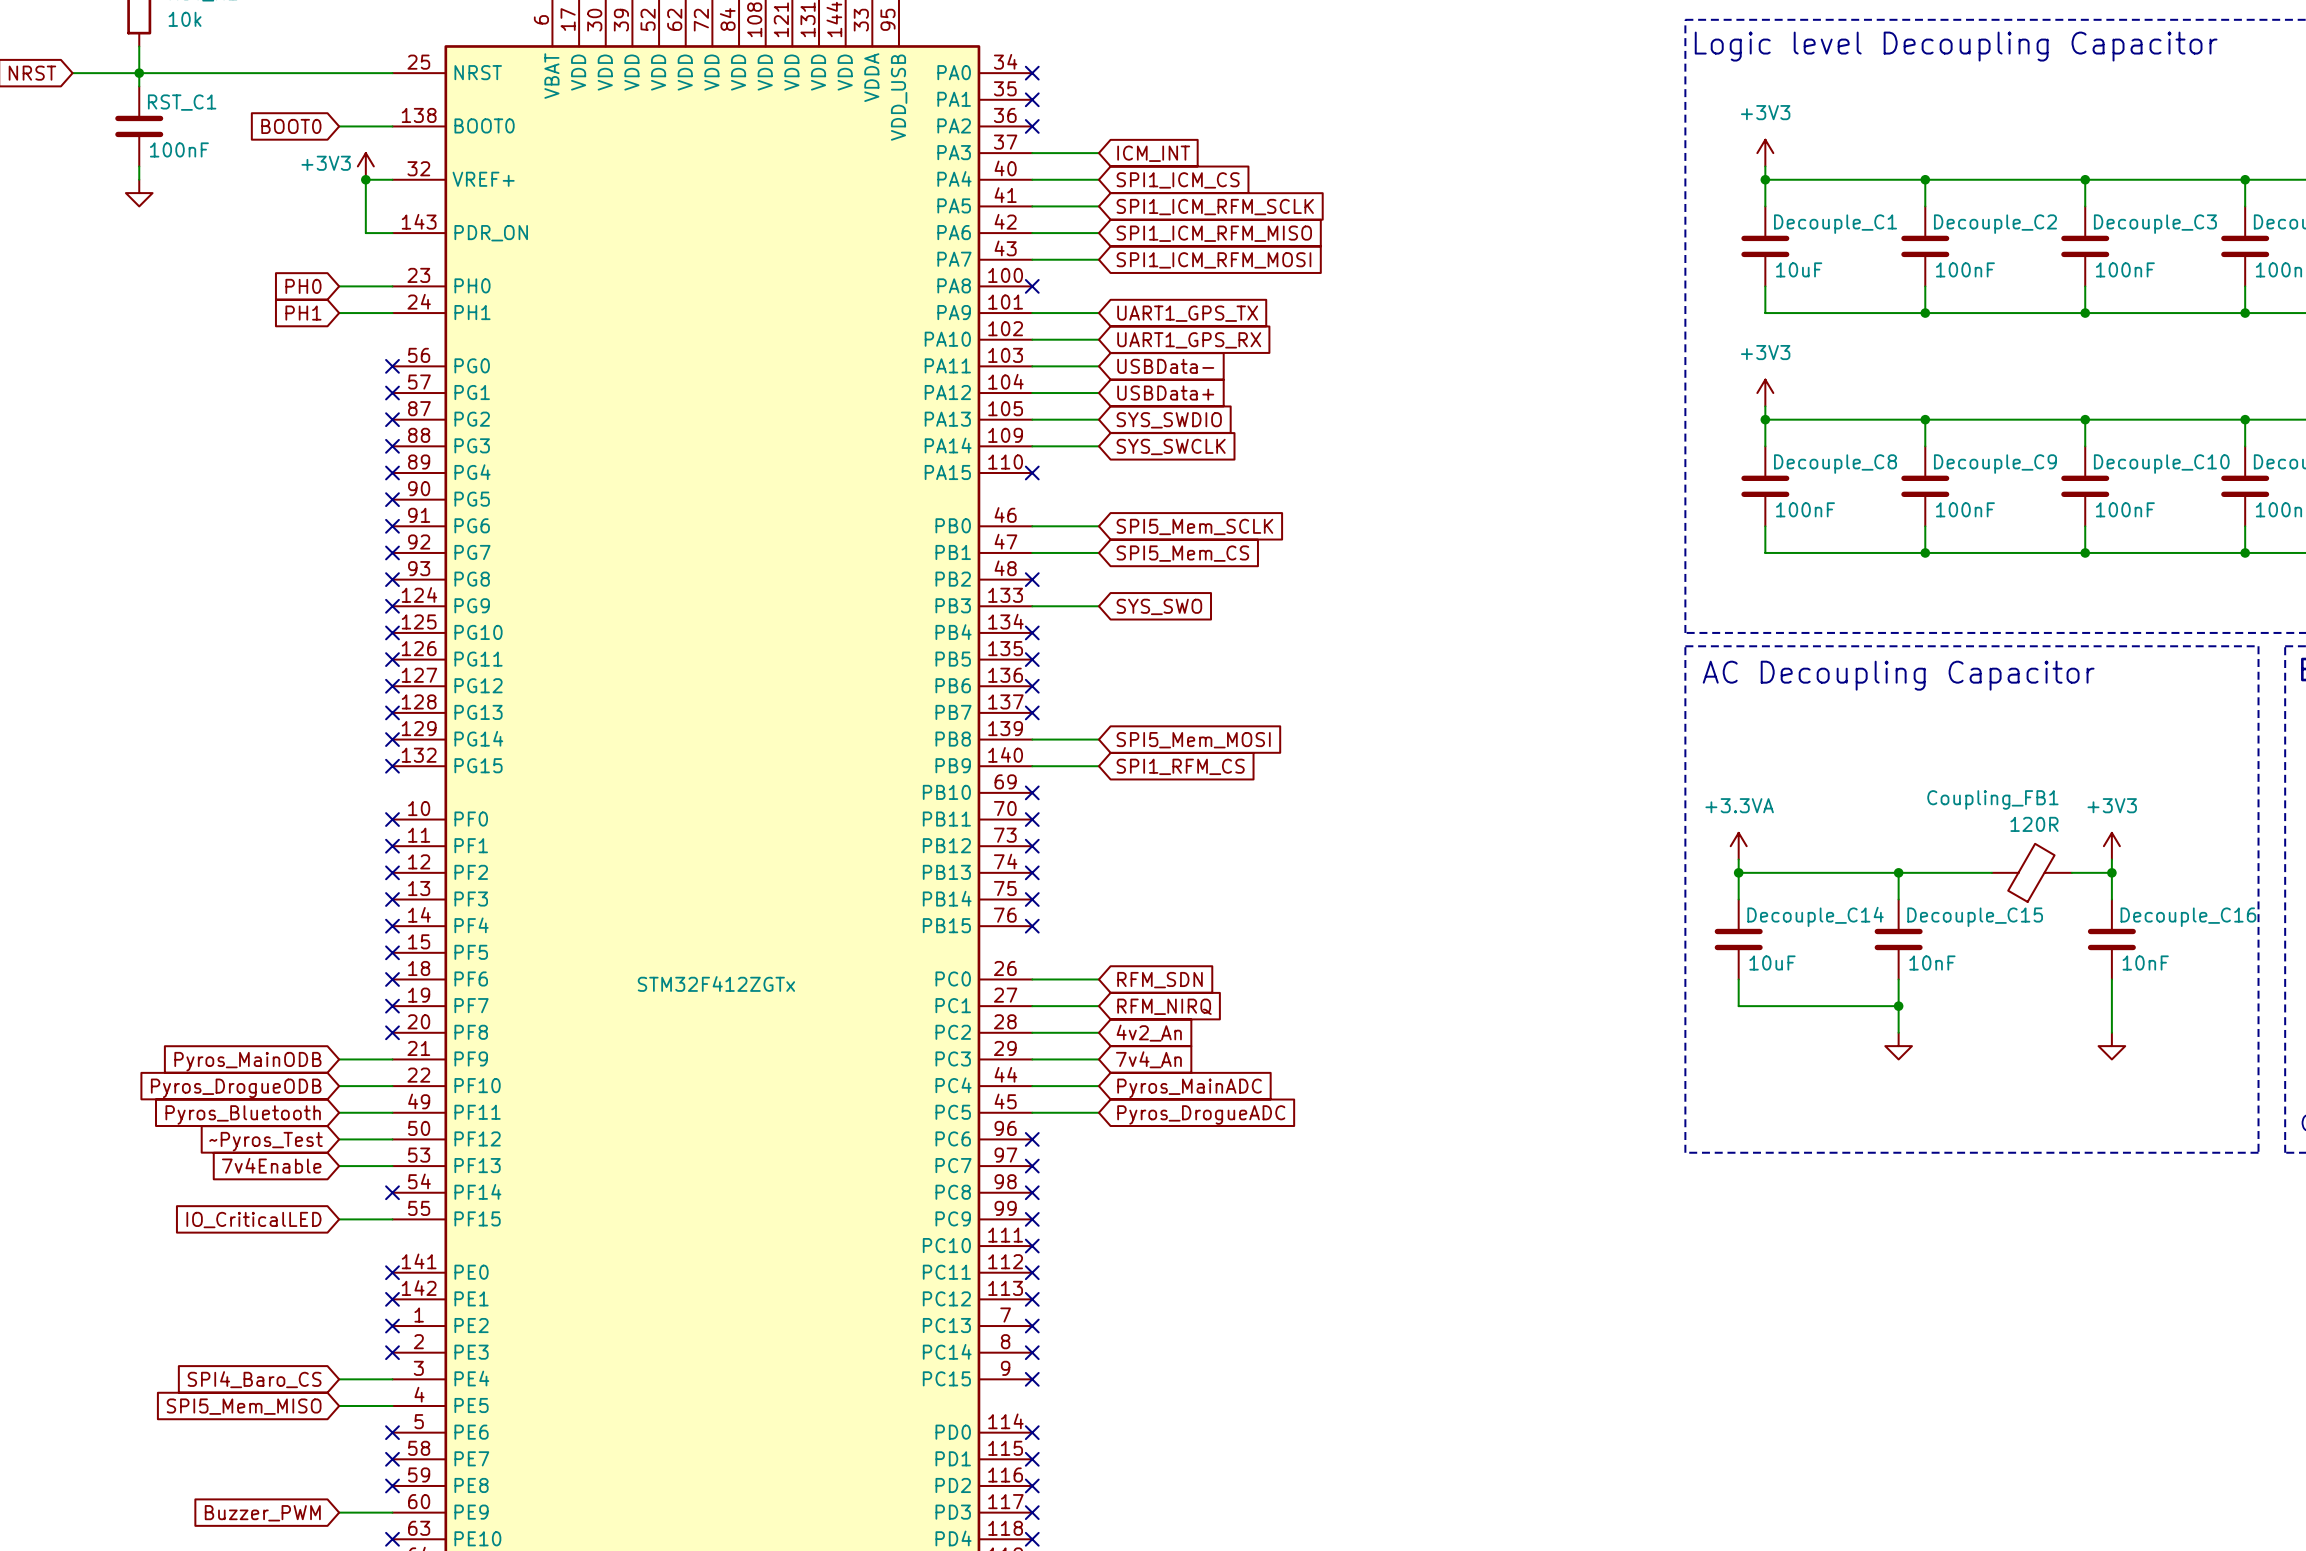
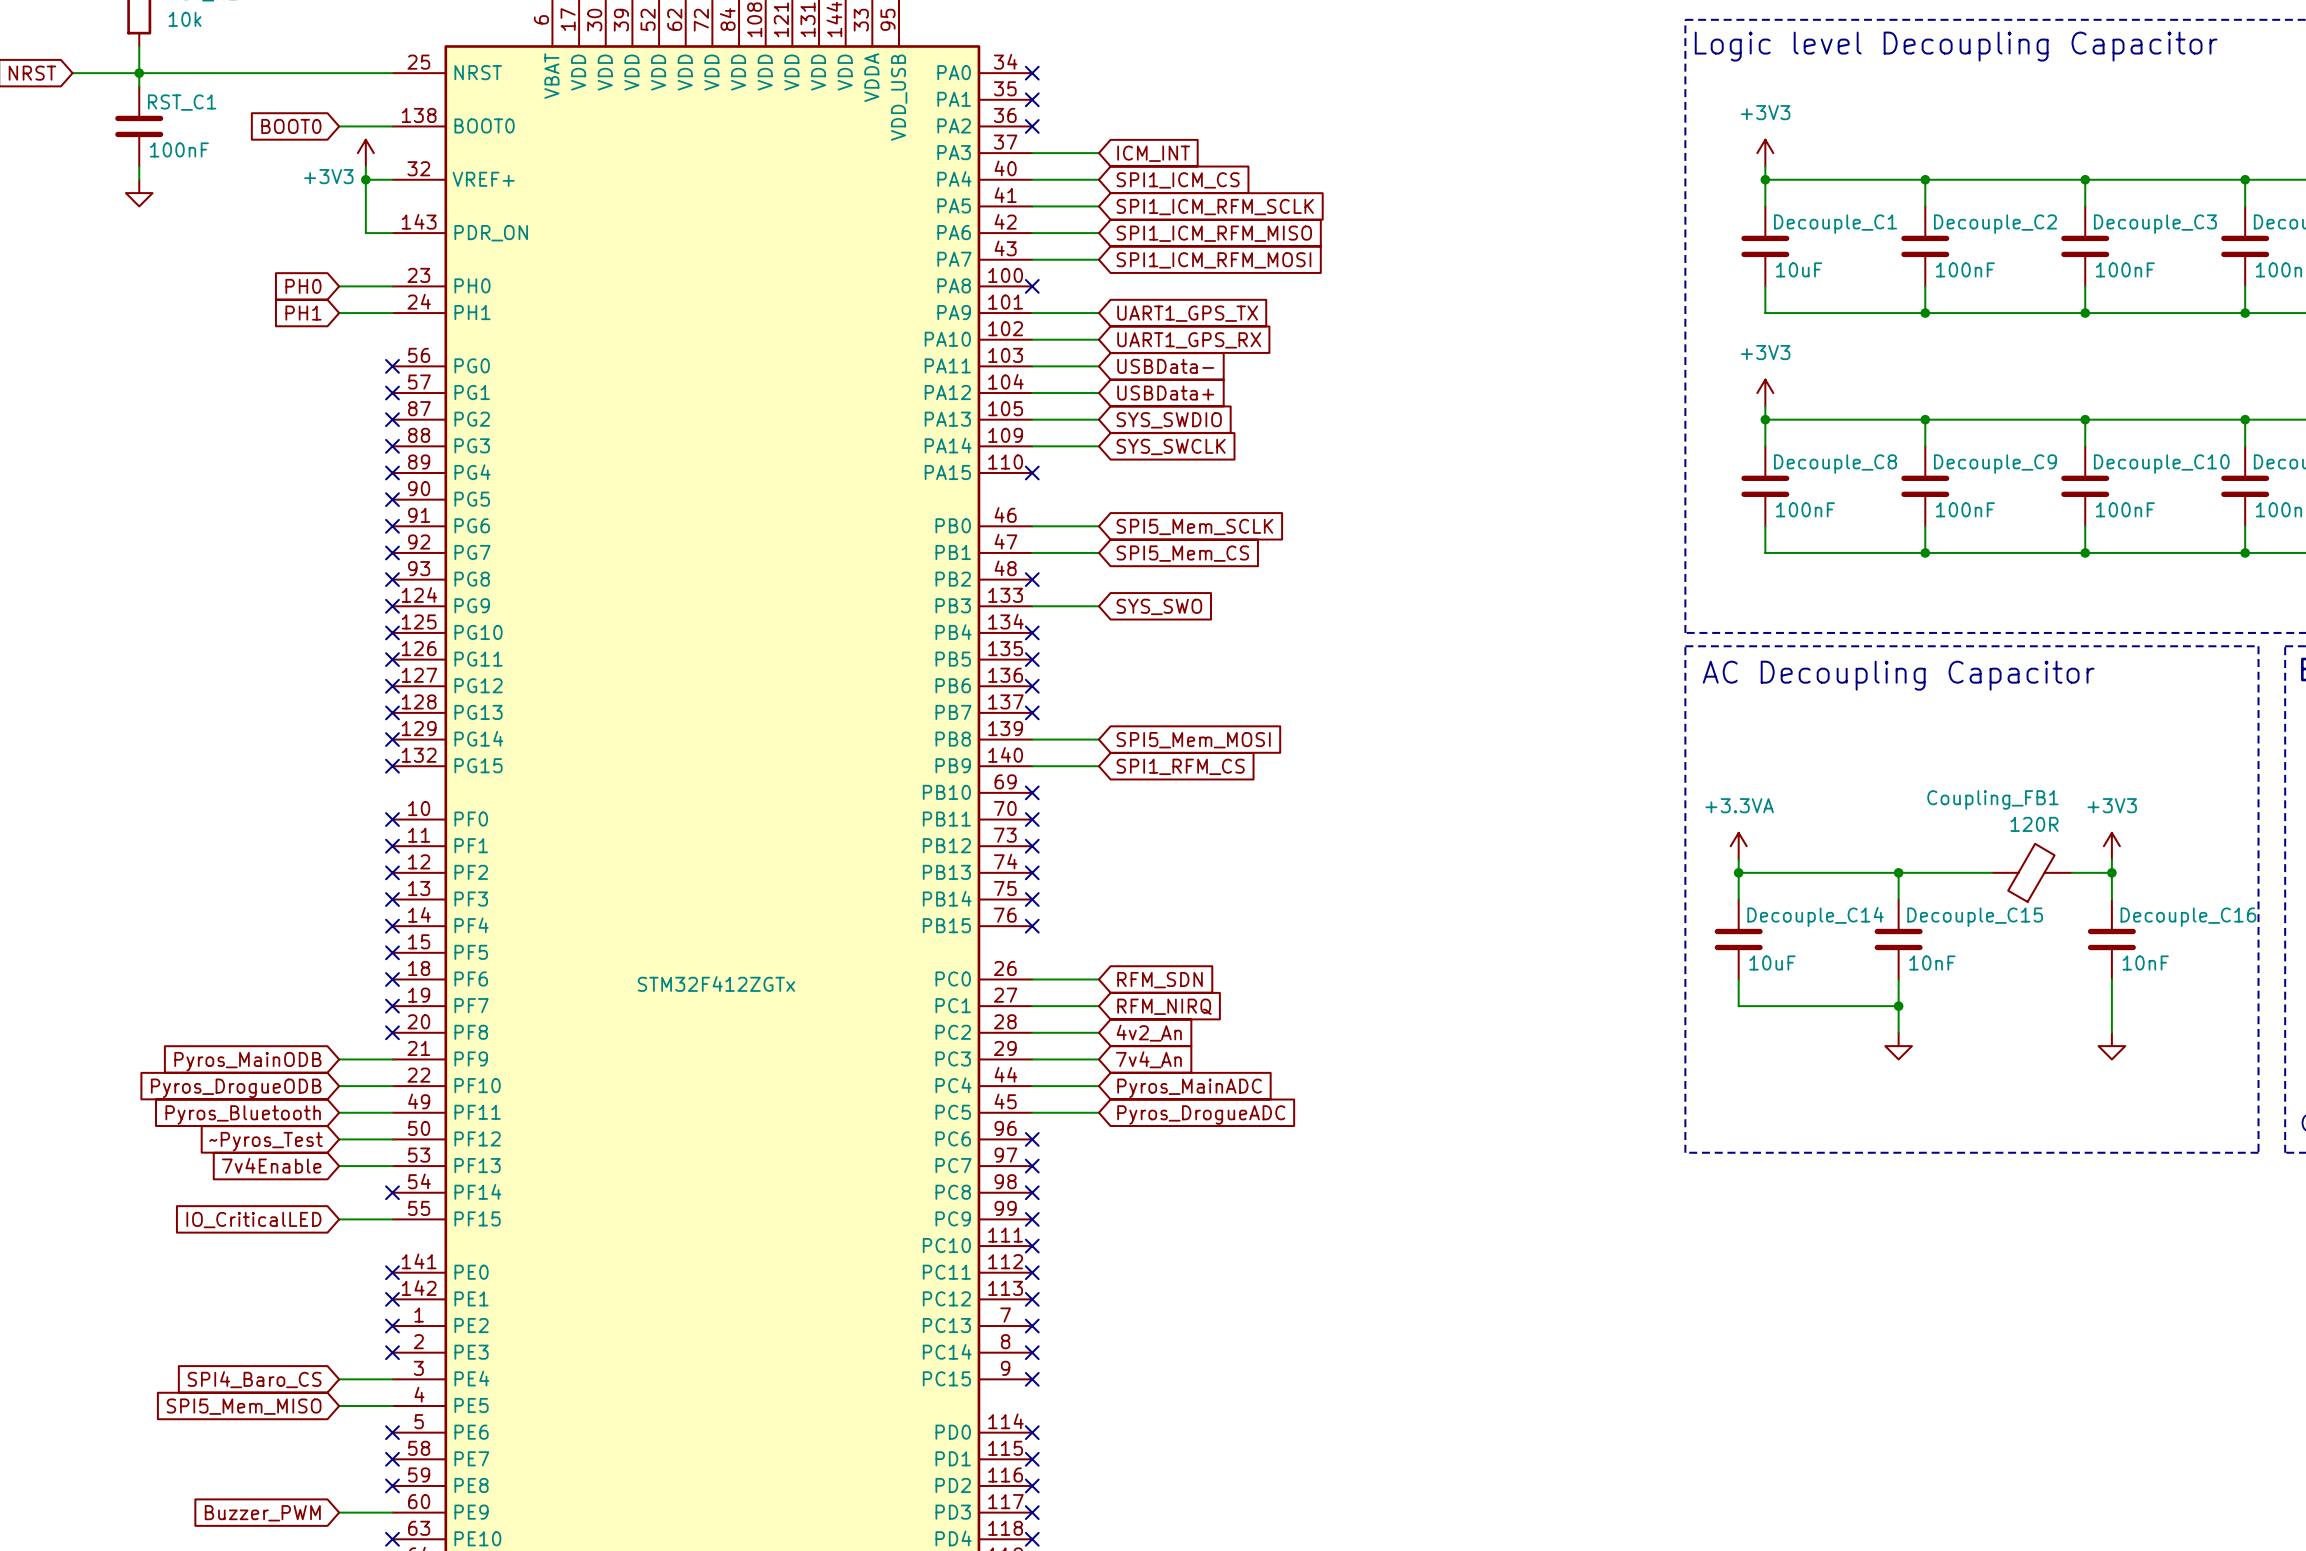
power symbol text position: +3V3 (326, 163) -> +3V3 (328, 176)
power symbol position: +3V3 (365, 166) -> +3V3 (365, 153)

